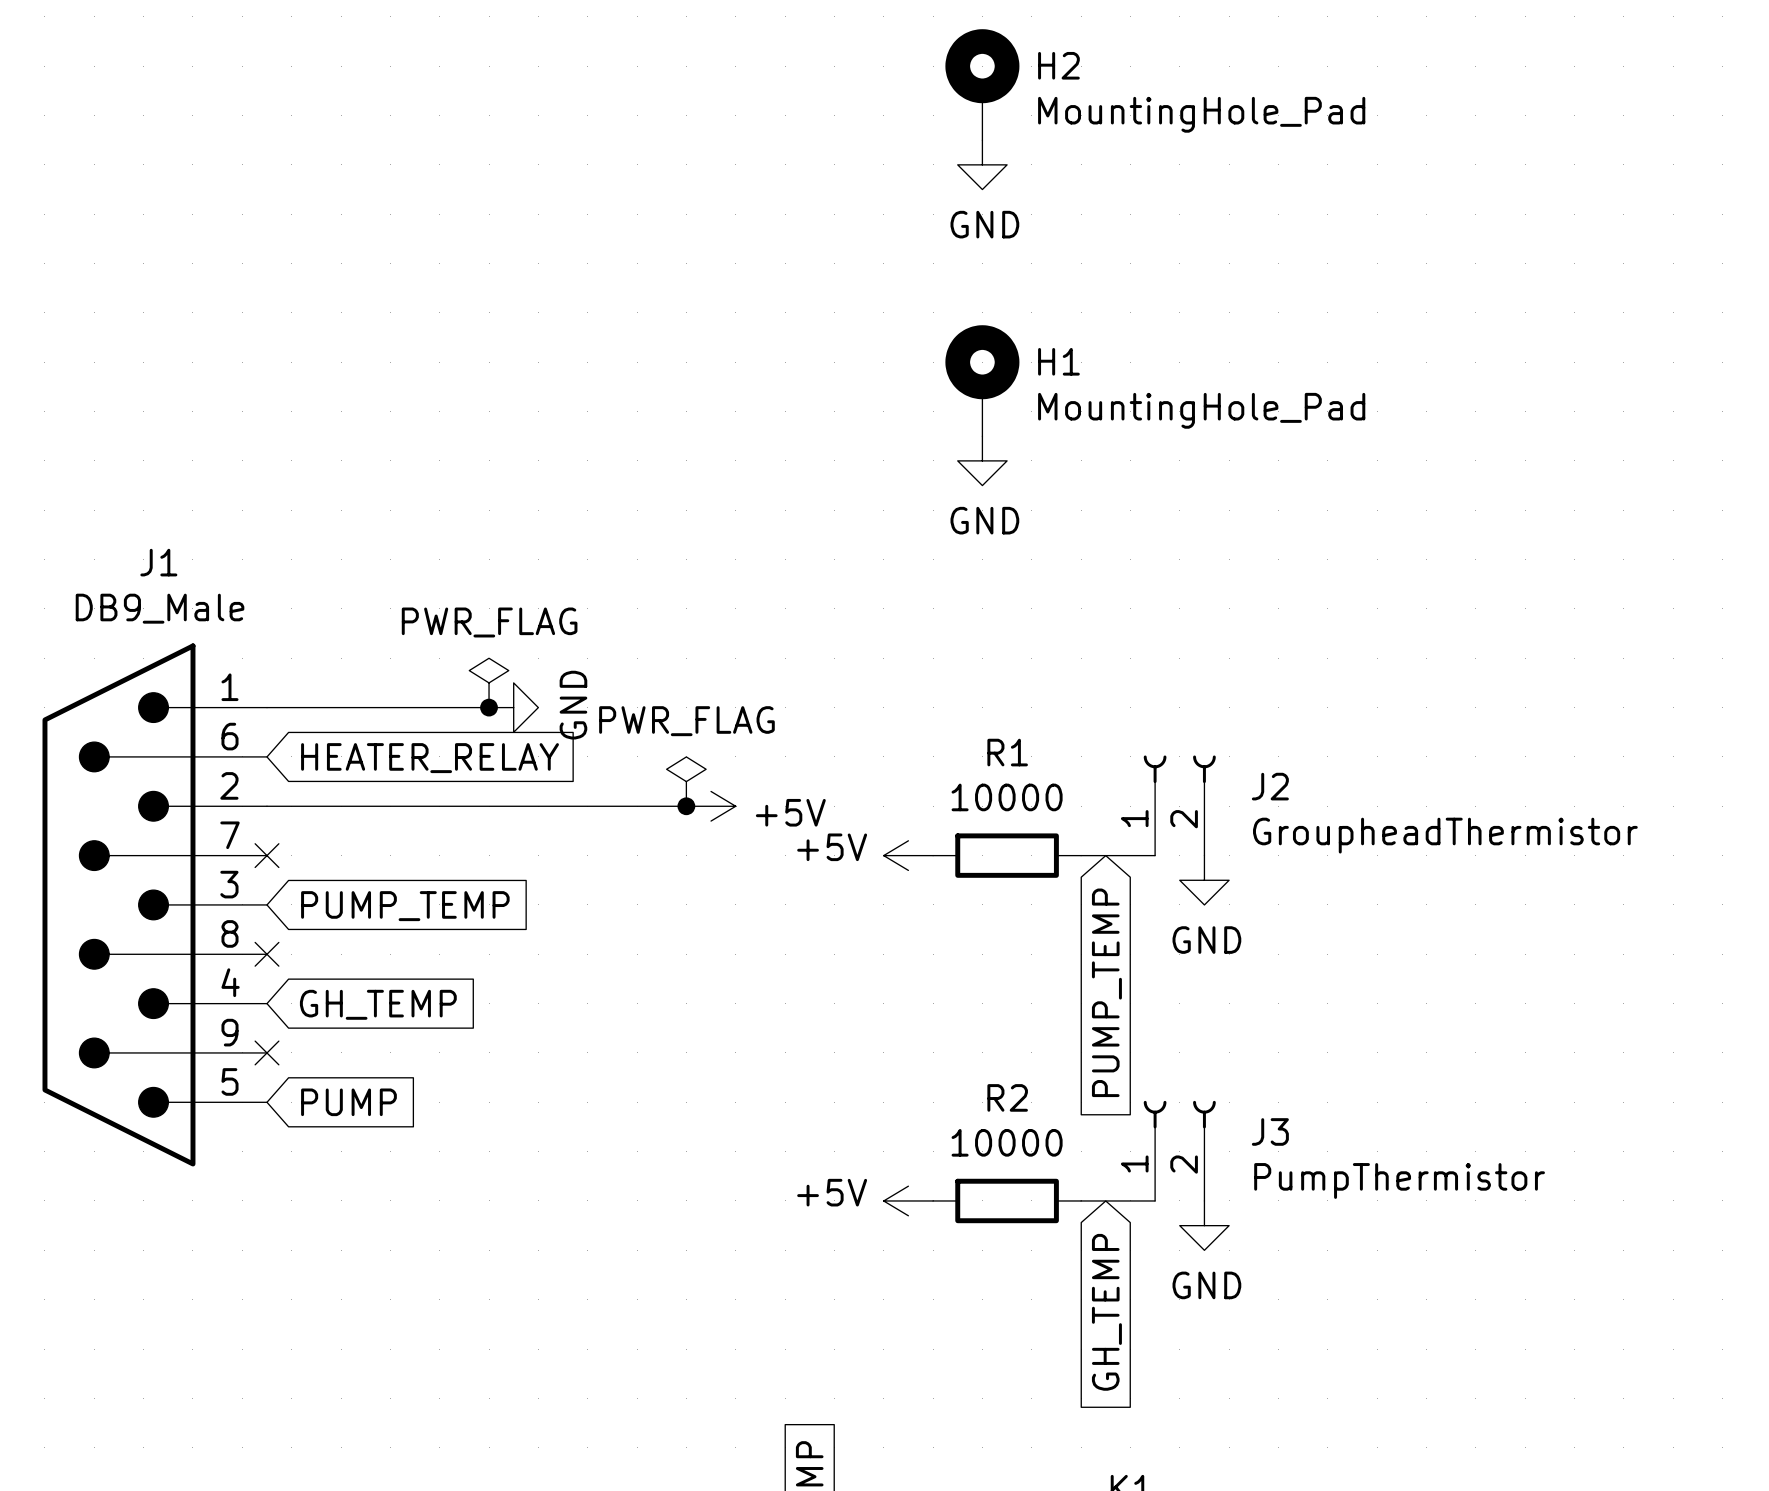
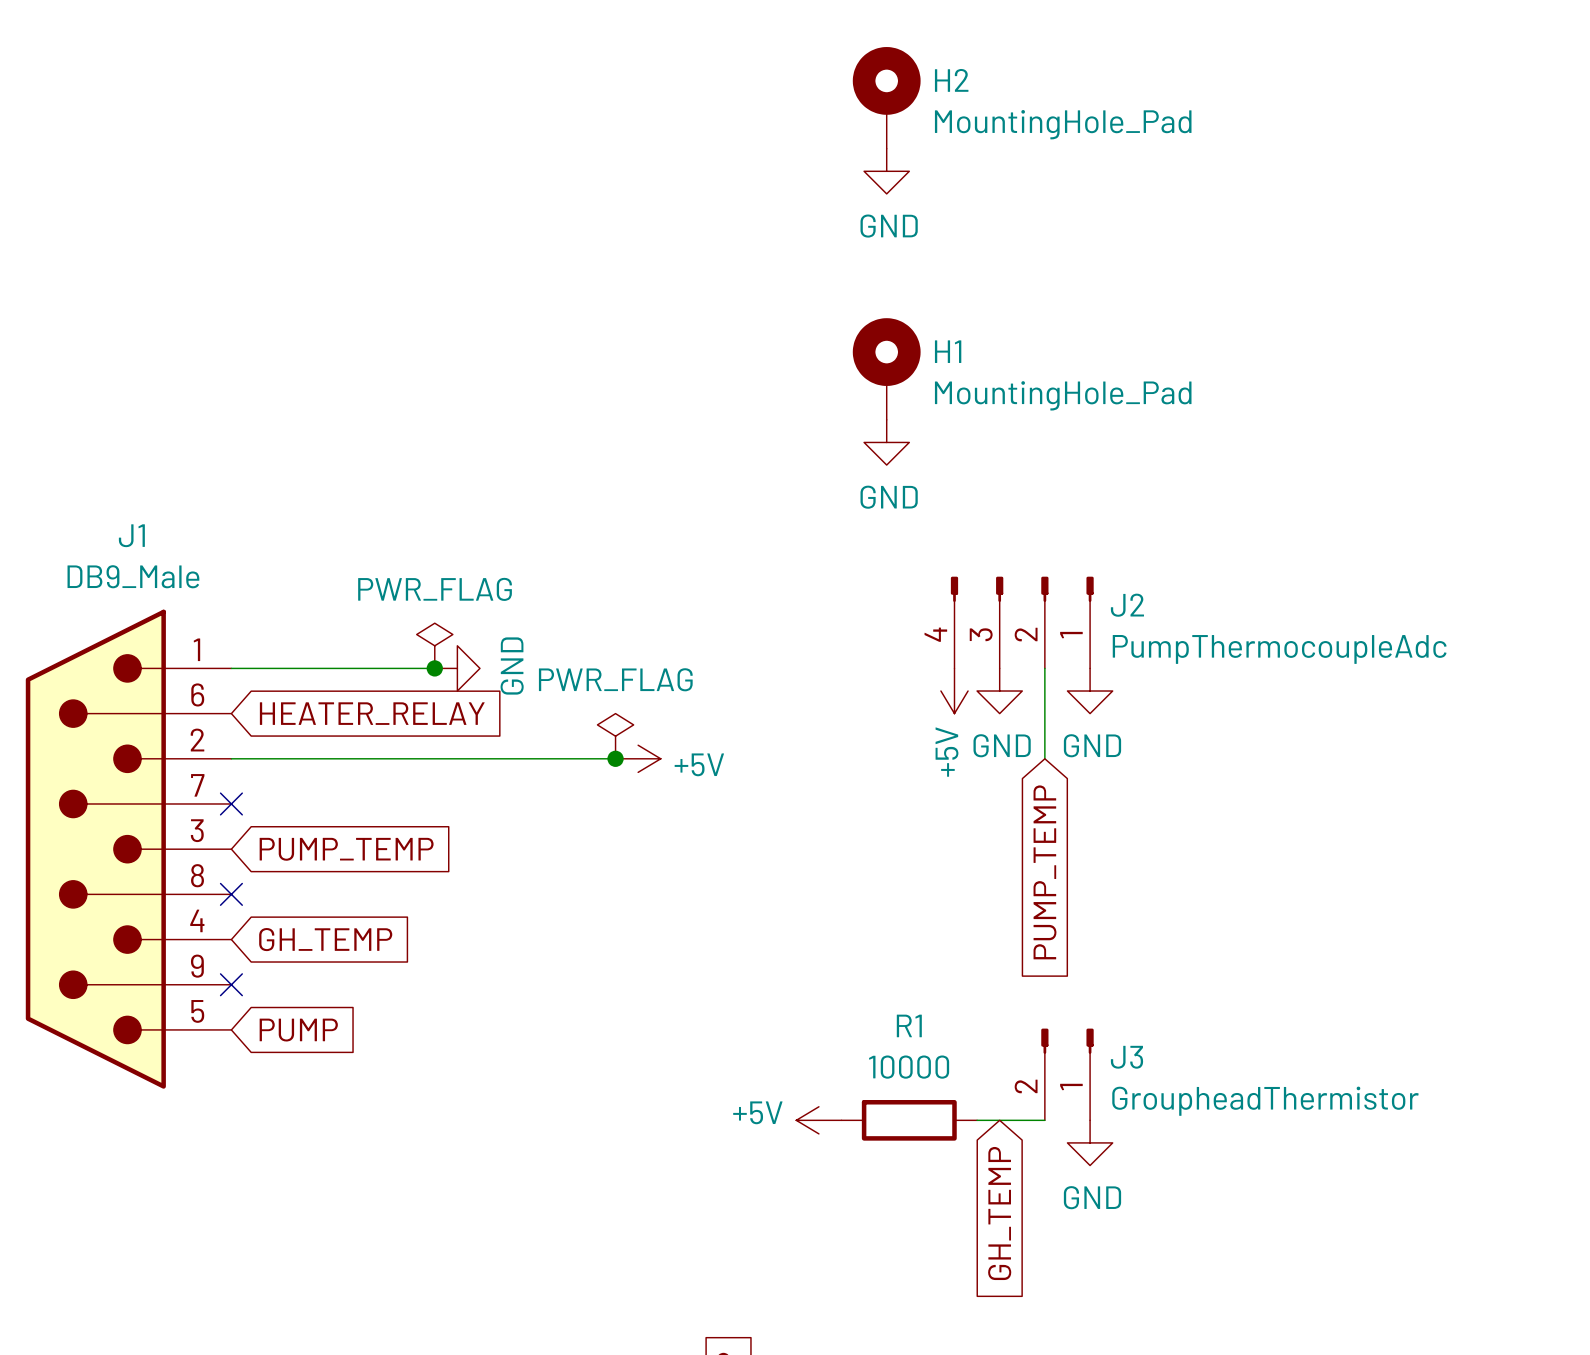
wire: none -> (1044, 668) (1044, 758)
power symbol: none -> GND (999, 691)
power symbol: none -> GND (1090, 691)
J2 symbol: [1143, 755, 1216, 856] -> [950, 576, 1094, 669]
J2 value: GroupheadThermistor (1445, 835) -> PumpThermocoupleAdc (1279, 649)
power symbol rotation: 0° (908, 855) -> 90° counterclockwise (954, 691)
power symbol position: +5V (908, 855) -> +5V (954, 691)
R1: 10000 (1007, 855) -> none
wire: (1081, 855) (1155, 855) -> none
power symbol: GND (1204, 880) -> none
global label position: PUMP_TEMP (1106, 992) -> PUMP_TEMP (1044, 872)
R2 name: R2 (1007, 1097) -> R1 (909, 1025)
J3 symbol: [1143, 1100, 1216, 1201] -> [1041, 1028, 1094, 1121]
J3 value: PumpThermistor (1399, 1180) -> GroupheadThermistor (1265, 1101)

